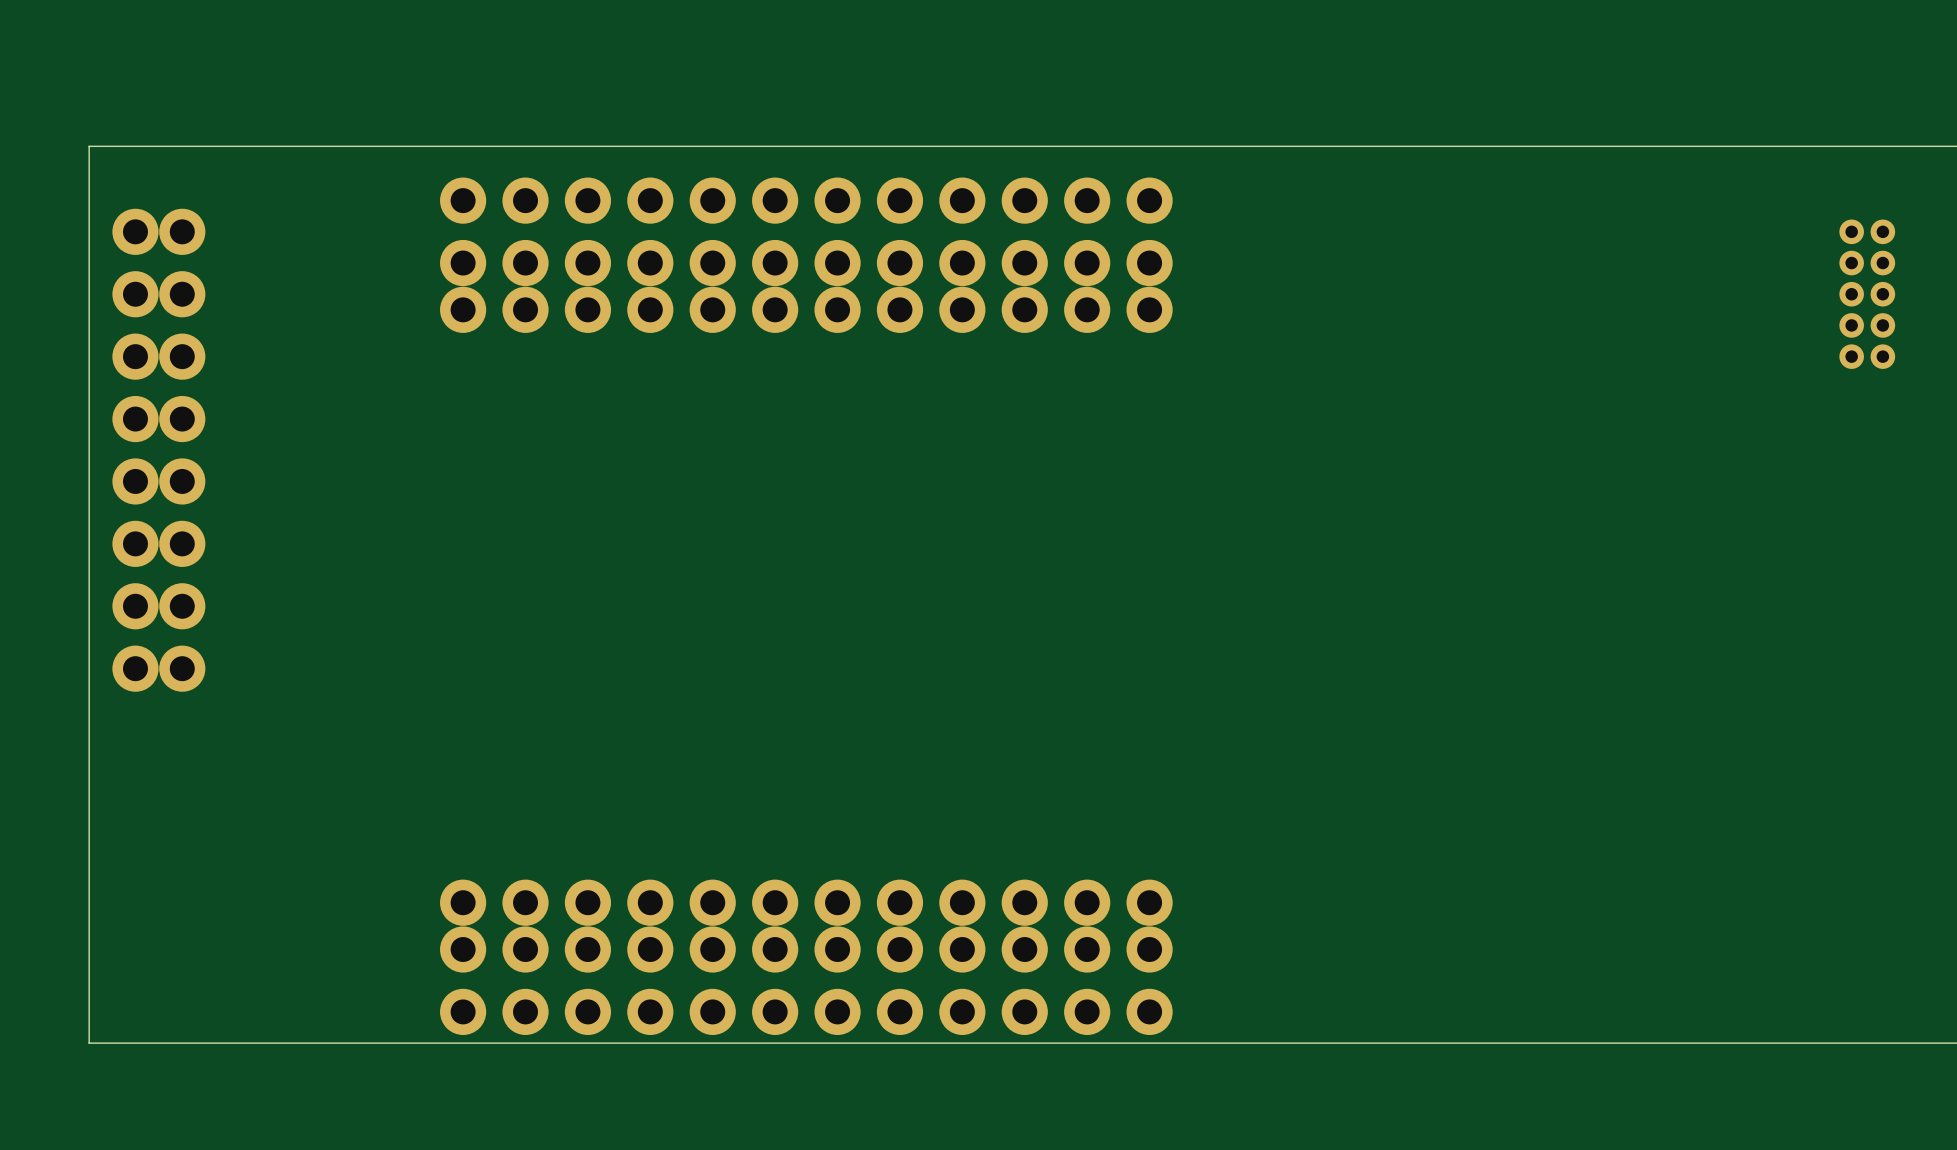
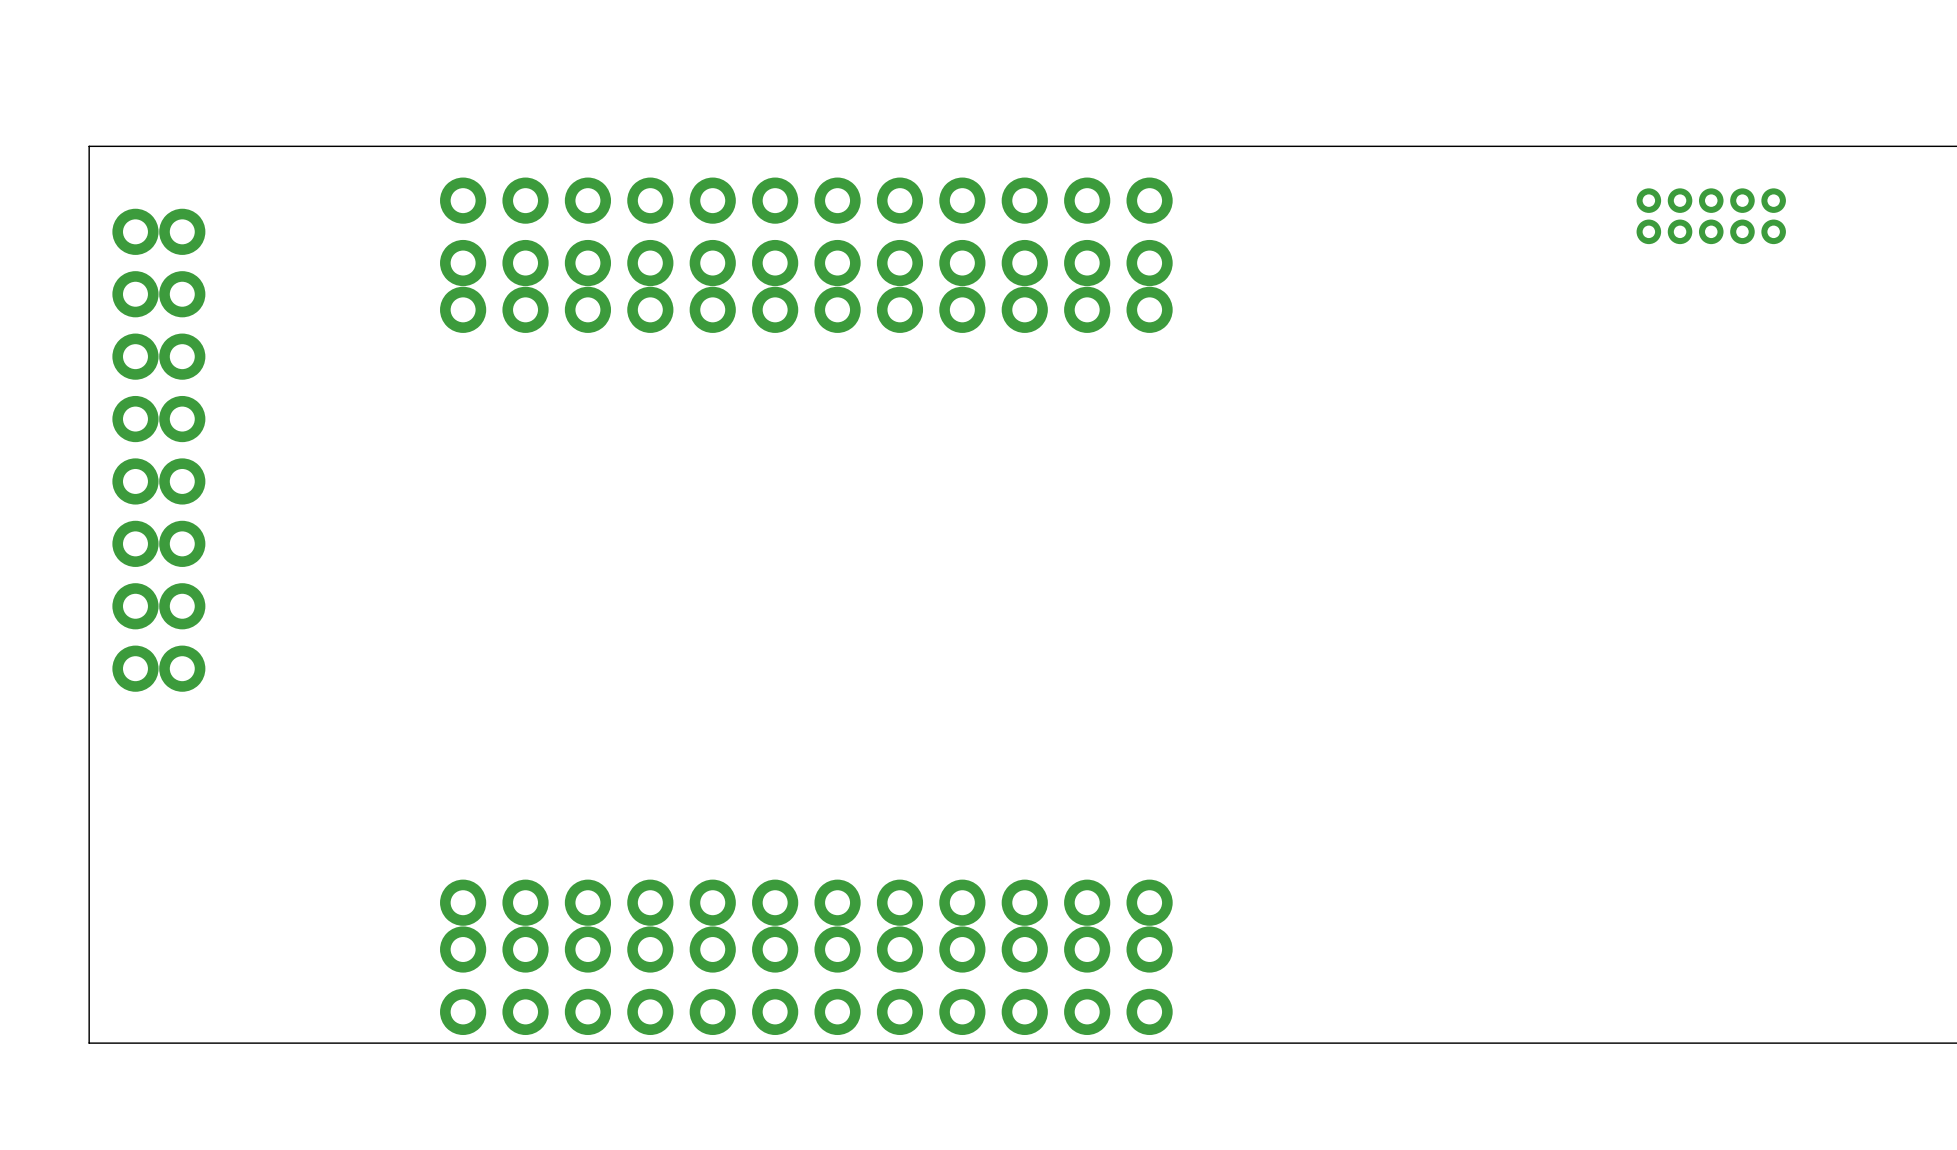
part rotation: 0° (1867, 294) -> 90° clockwise (1711, 216)
part position: (1867, 294) -> (1711, 216)

